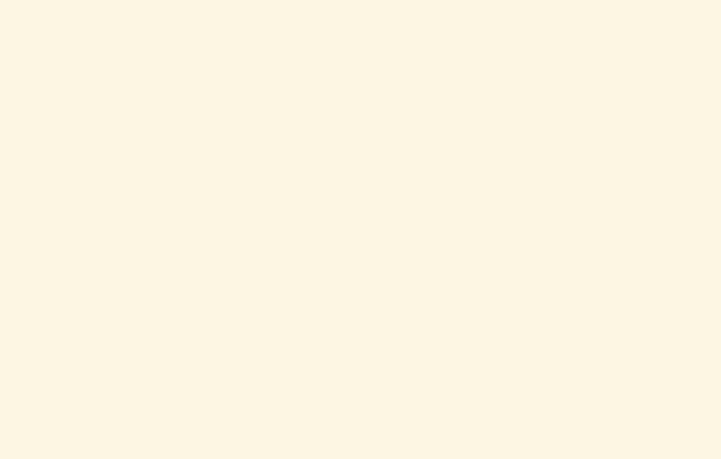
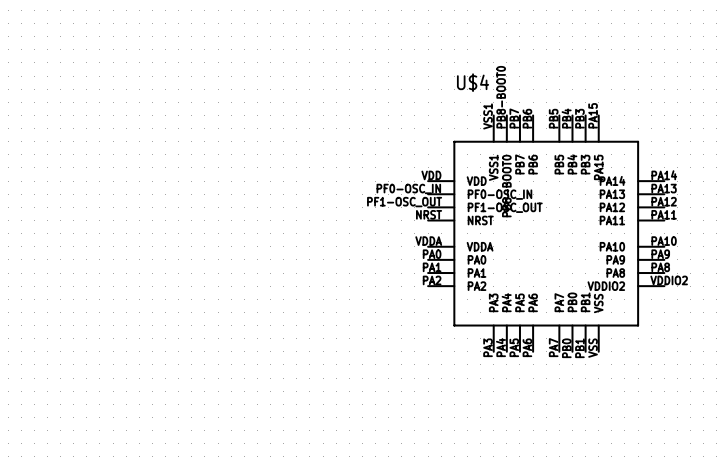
U$4: none -> (546, 233)

